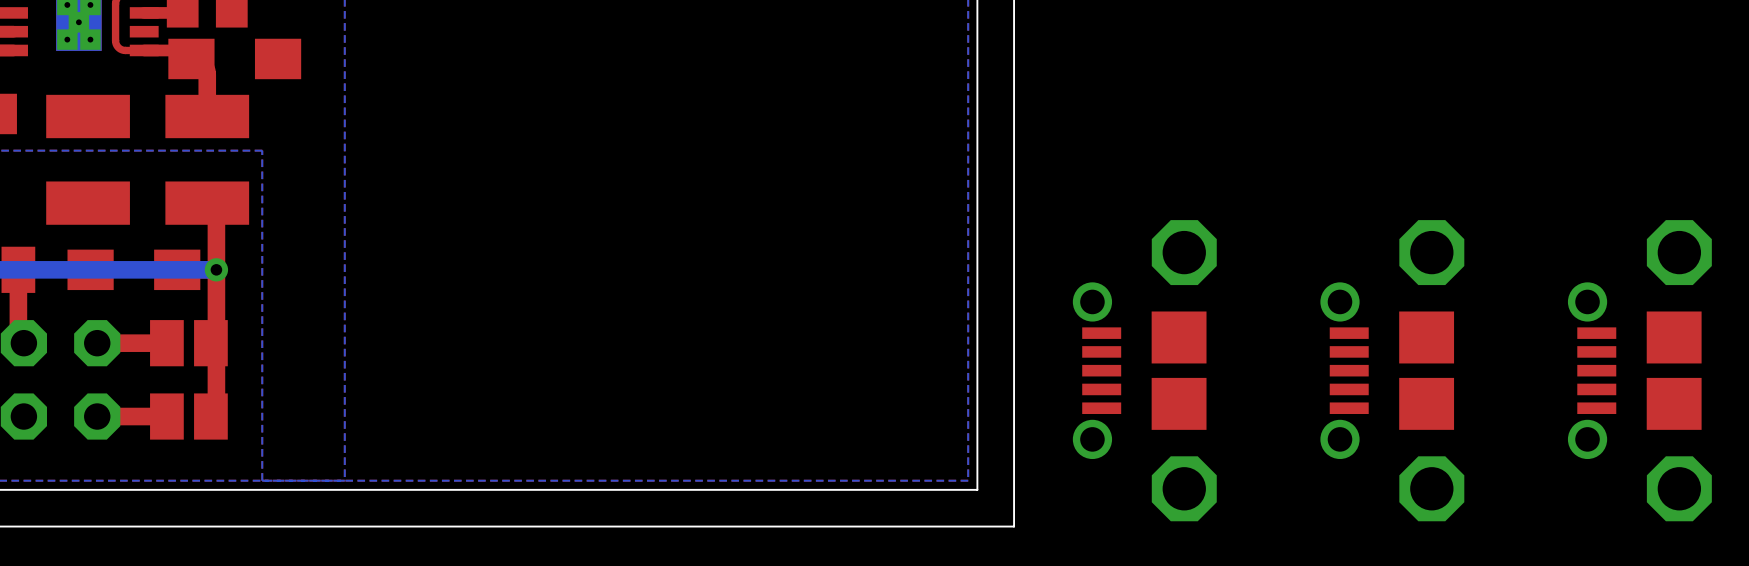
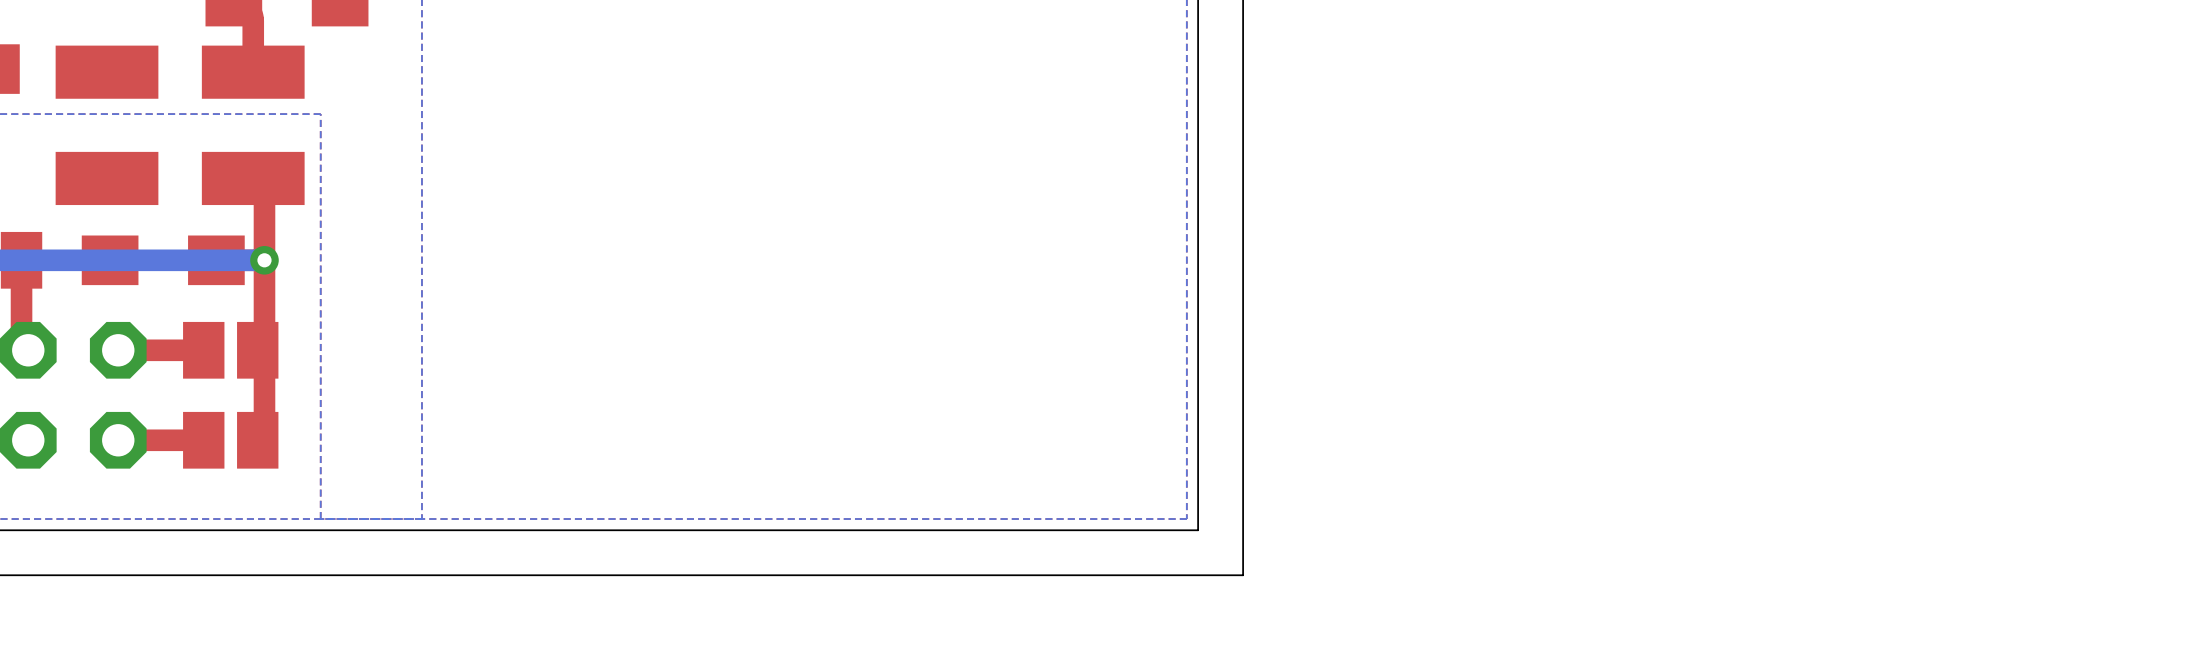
part: (1144, 370) -> none
part: (1392, 370) -> none
part: (1639, 370) -> none

